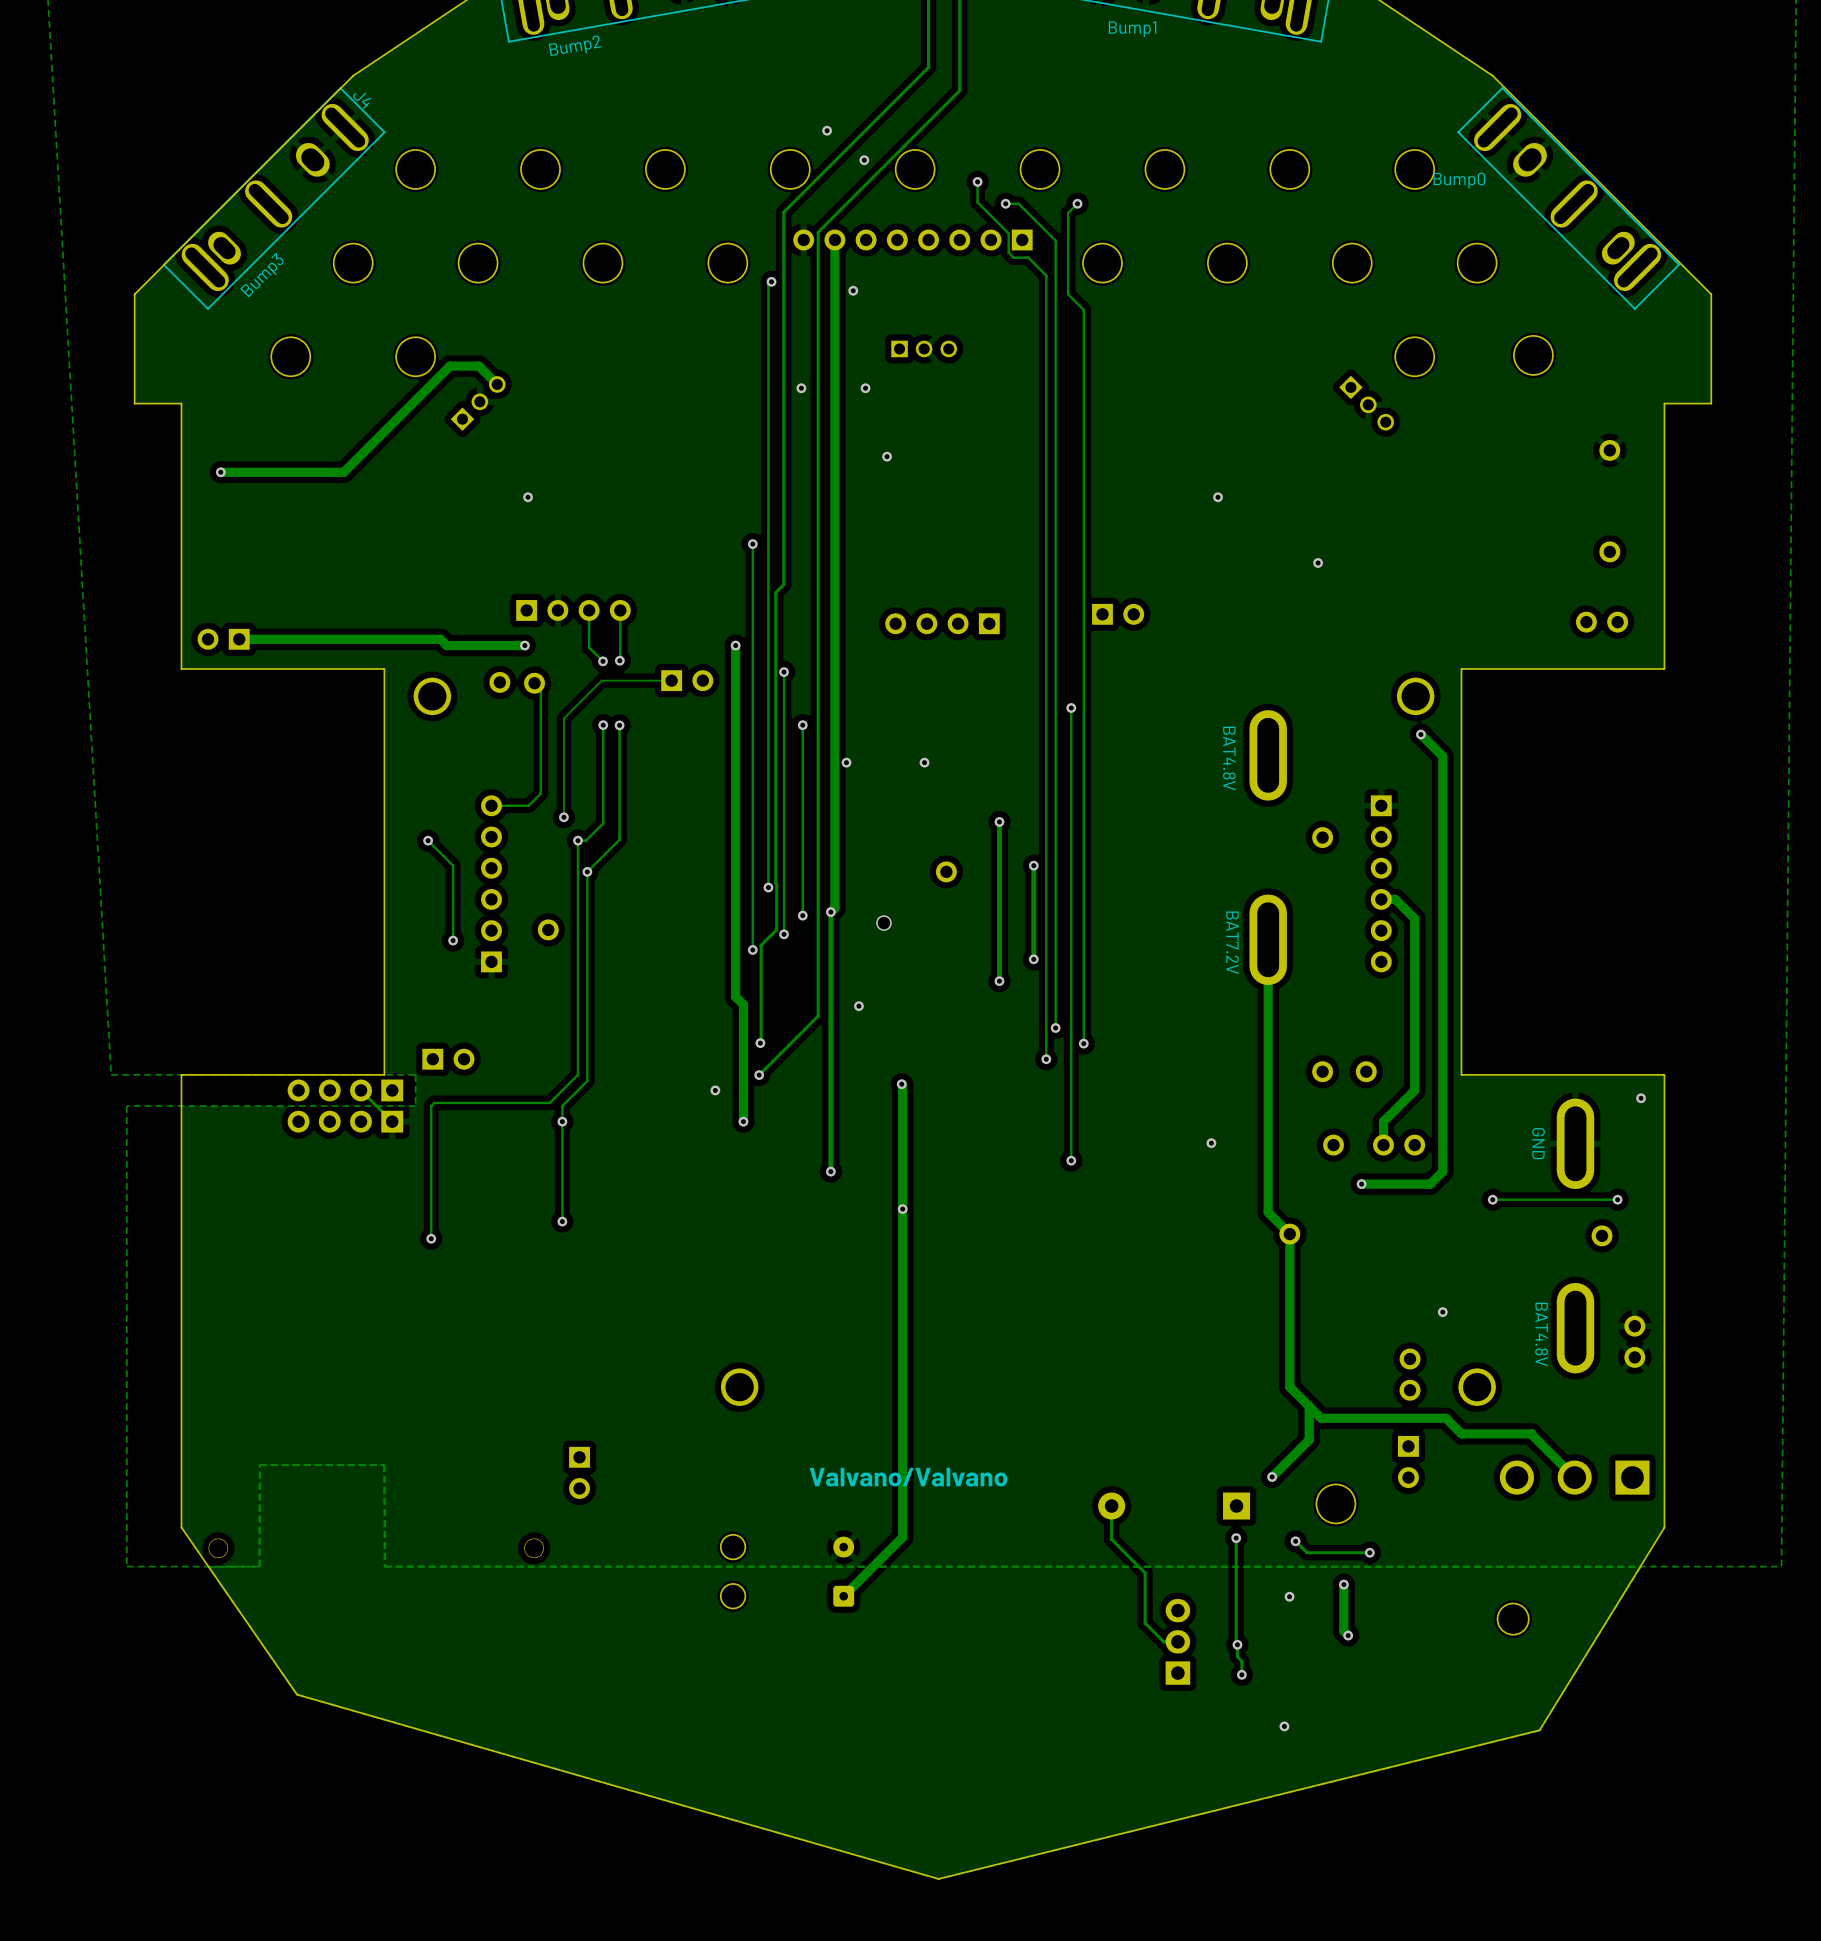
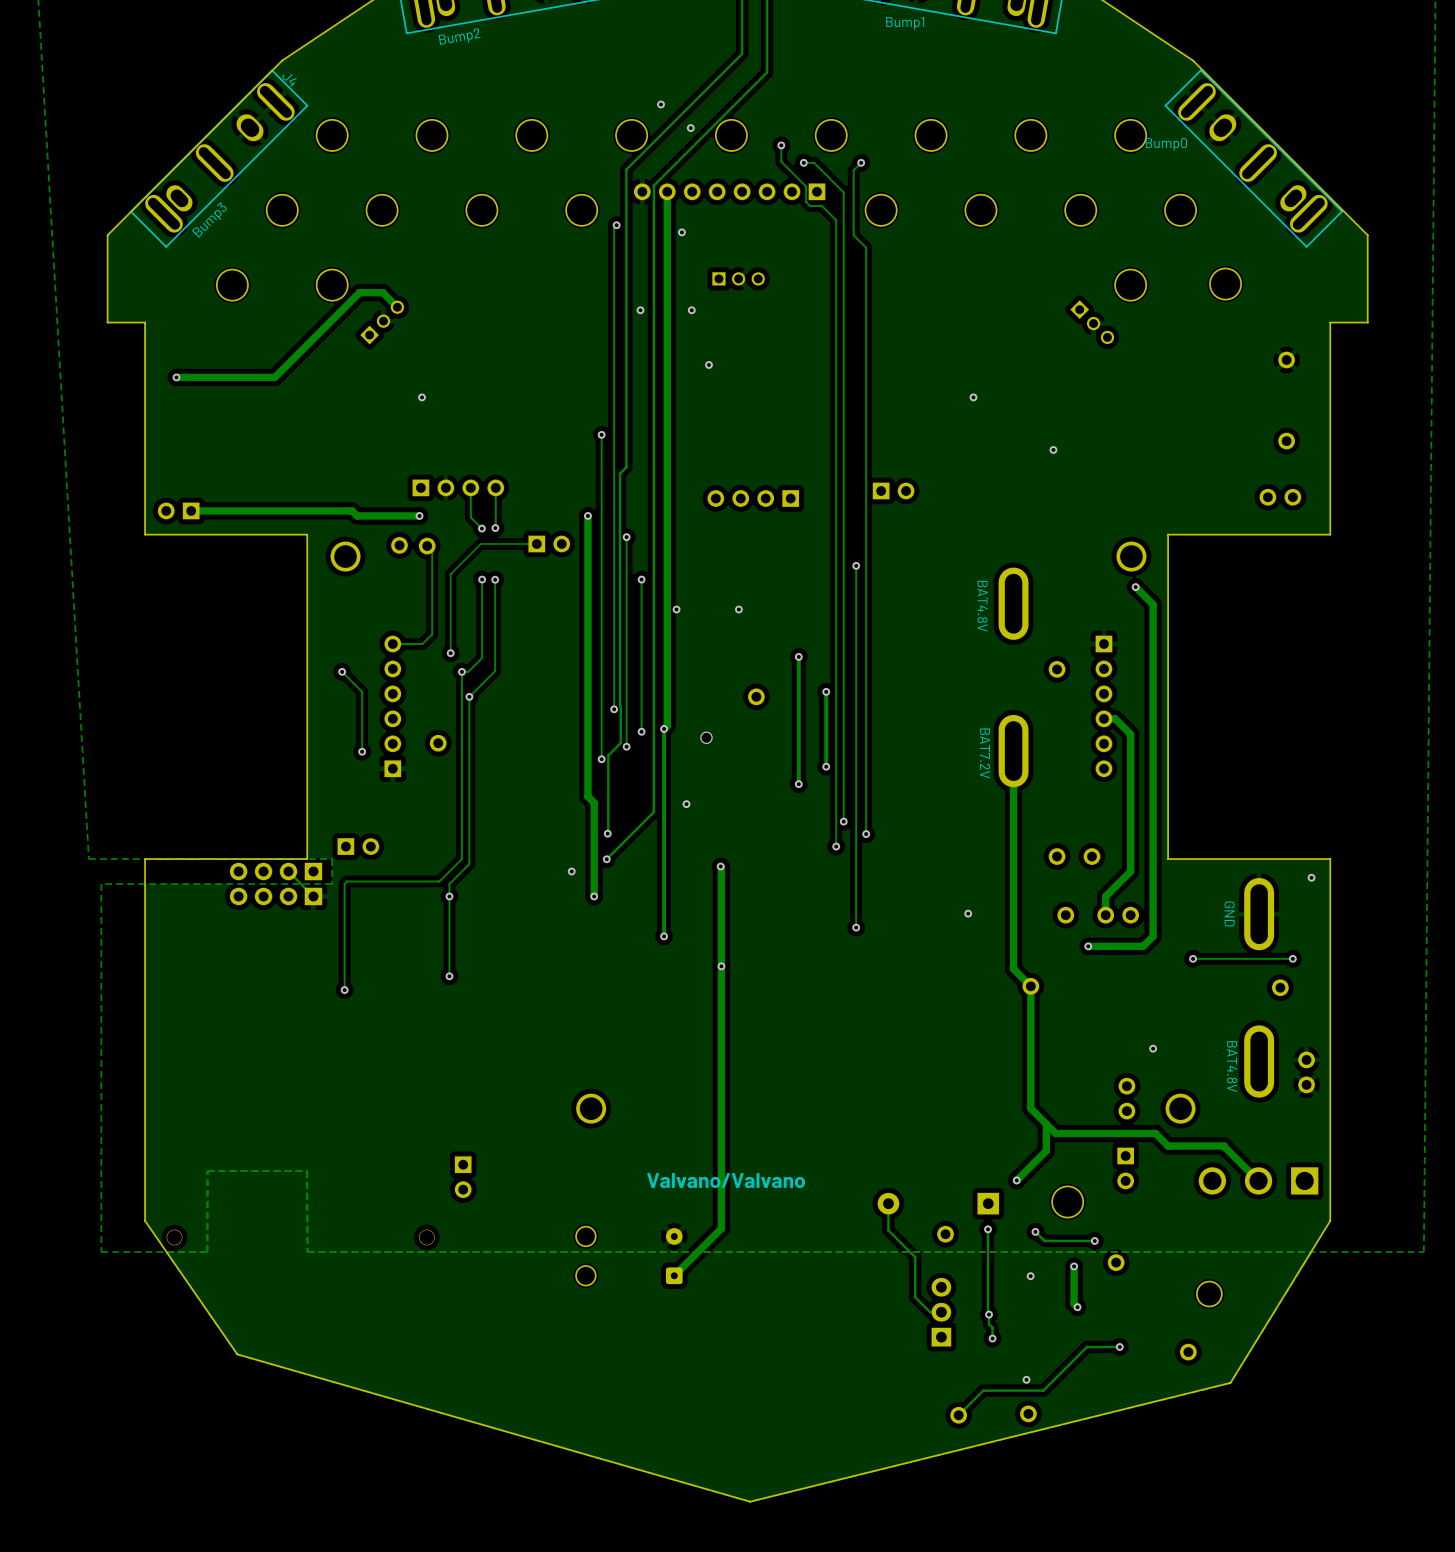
part: none -> (945, 1234)
part: none -> (1116, 1262)
track: none -> (1119, 1346) (1086, 1346) (1043, 1390) (983, 1390) (958, 1415)
via: none -> (1119, 1346)
part: none -> (1188, 1352)
part: none -> (1028, 1413)
part: none -> (958, 1415)

